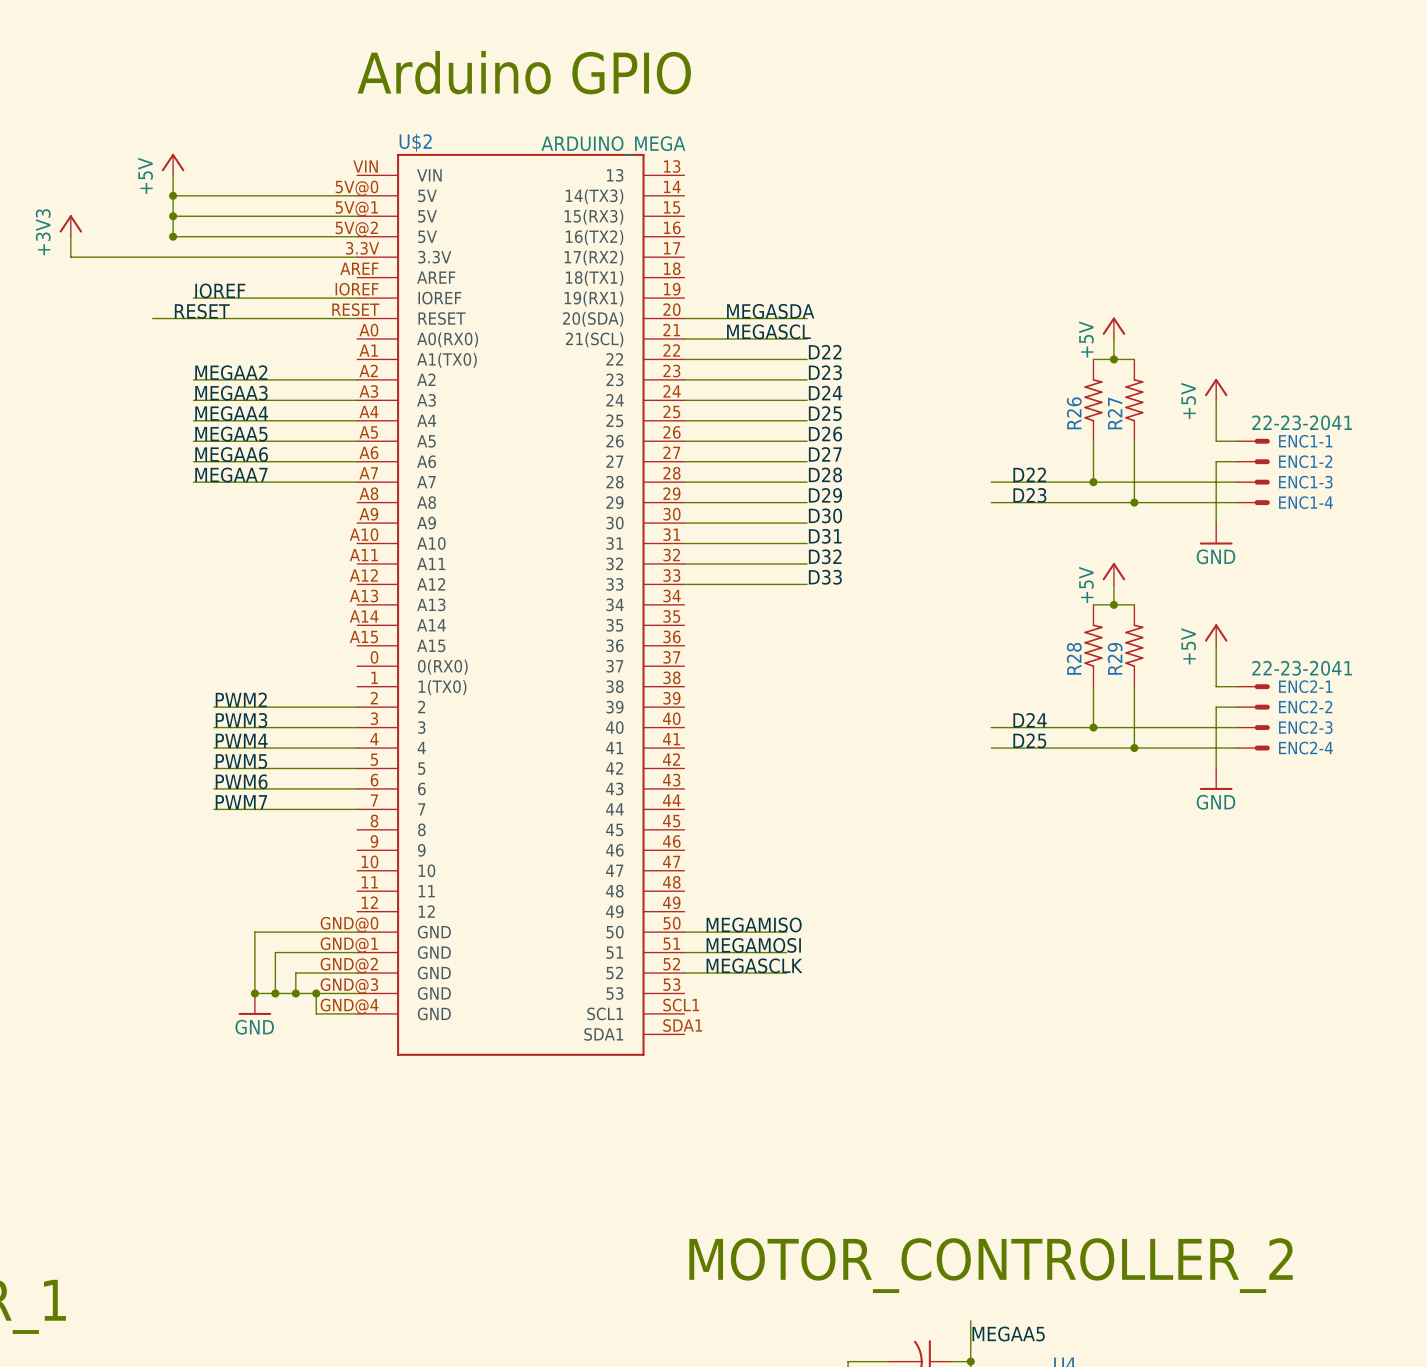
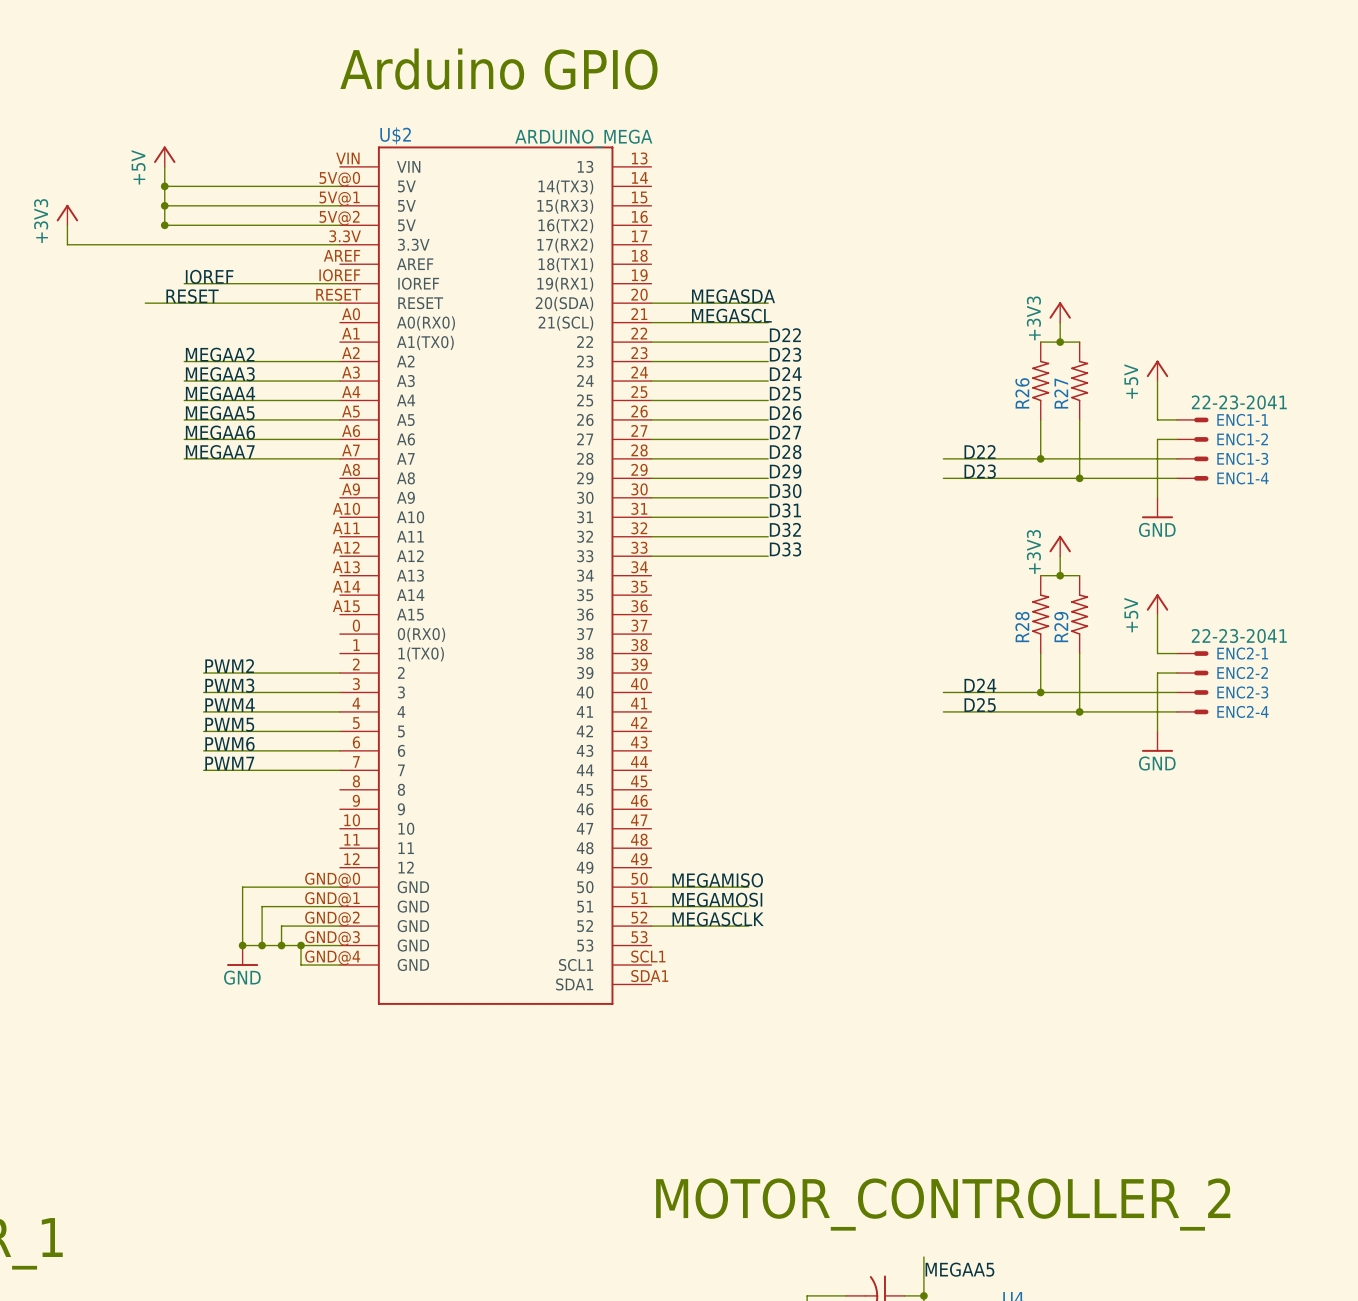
power symbol: +5V (1113, 328) -> +3V3 (1060, 312)
power symbol: +5V (1113, 573) -> +3V3 (1060, 545)

